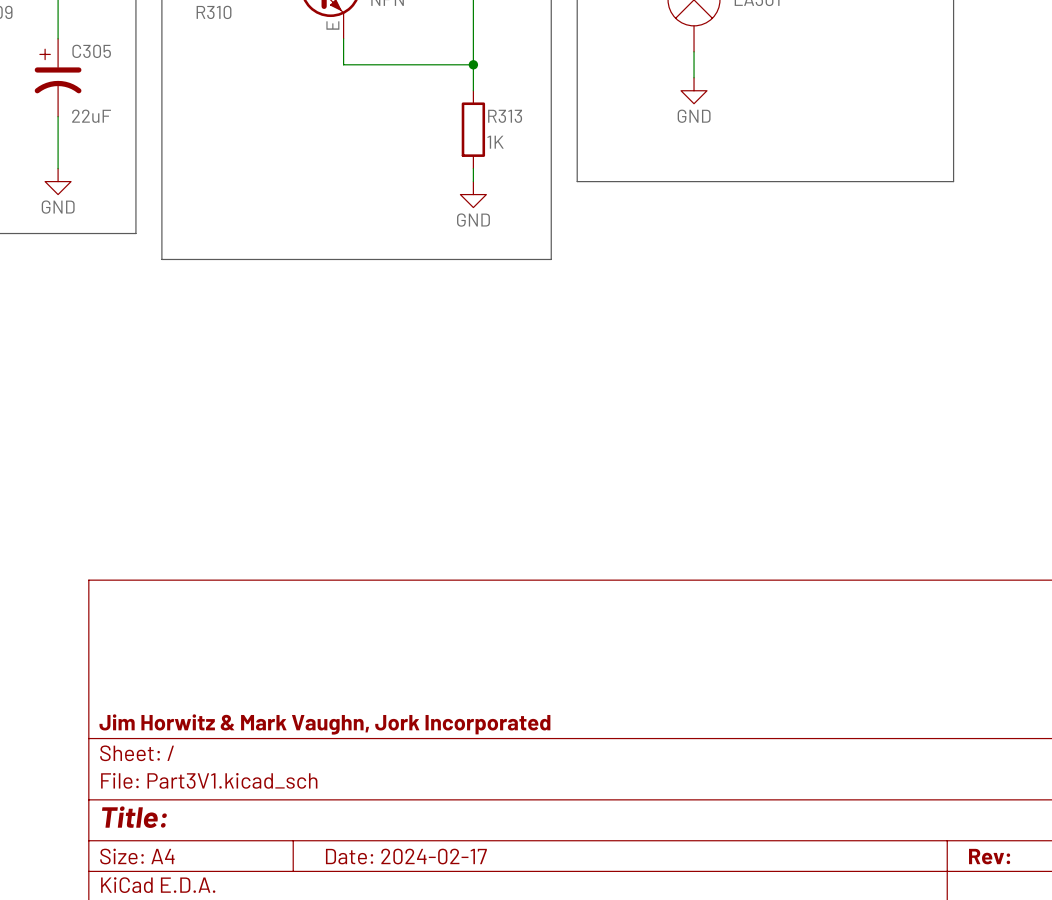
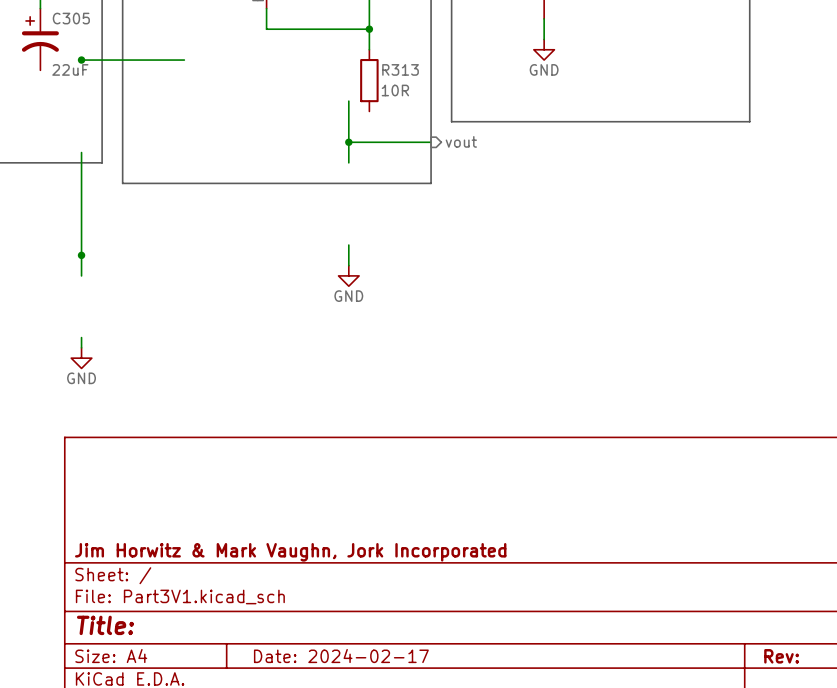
wire: none -> (81, 60) (184, 60)
junction: none -> (81, 60)
wire: (58, 116) (58, 168) -> none
R313 value: 1K (495, 142) -> 10R (395, 90)
wire: none -> (348, 101) (348, 162)
wire: (473, 168) (473, 181) -> none
power symbol: GND (58, 181) -> none
power symbol position: GND (473, 194) -> GND (348, 275)
wire: none -> (348, 142) (431, 142)
junction: none -> (348, 142)
hierarchical label: none -> vout (461, 141)
wire: none -> (81, 152) (81, 275)
wire: none -> (348, 245) (348, 265)
junction: none -> (81, 255)
wire: none -> (81, 337) (81, 347)
power symbol: none -> GND (81, 358)

